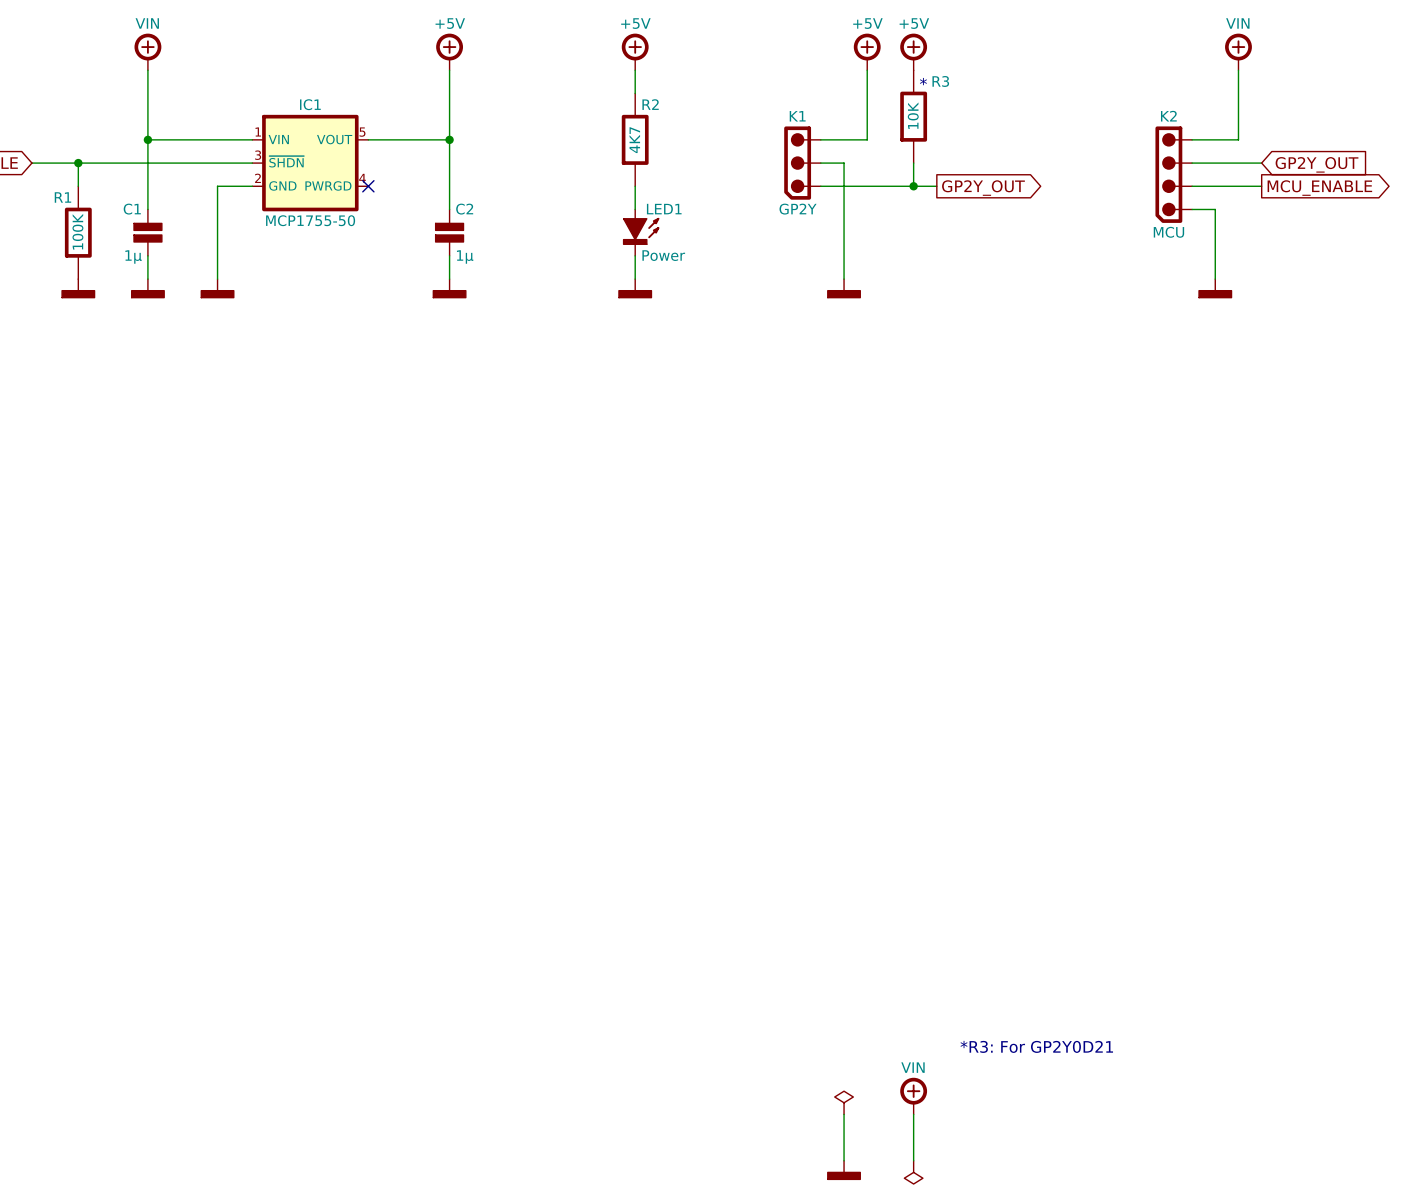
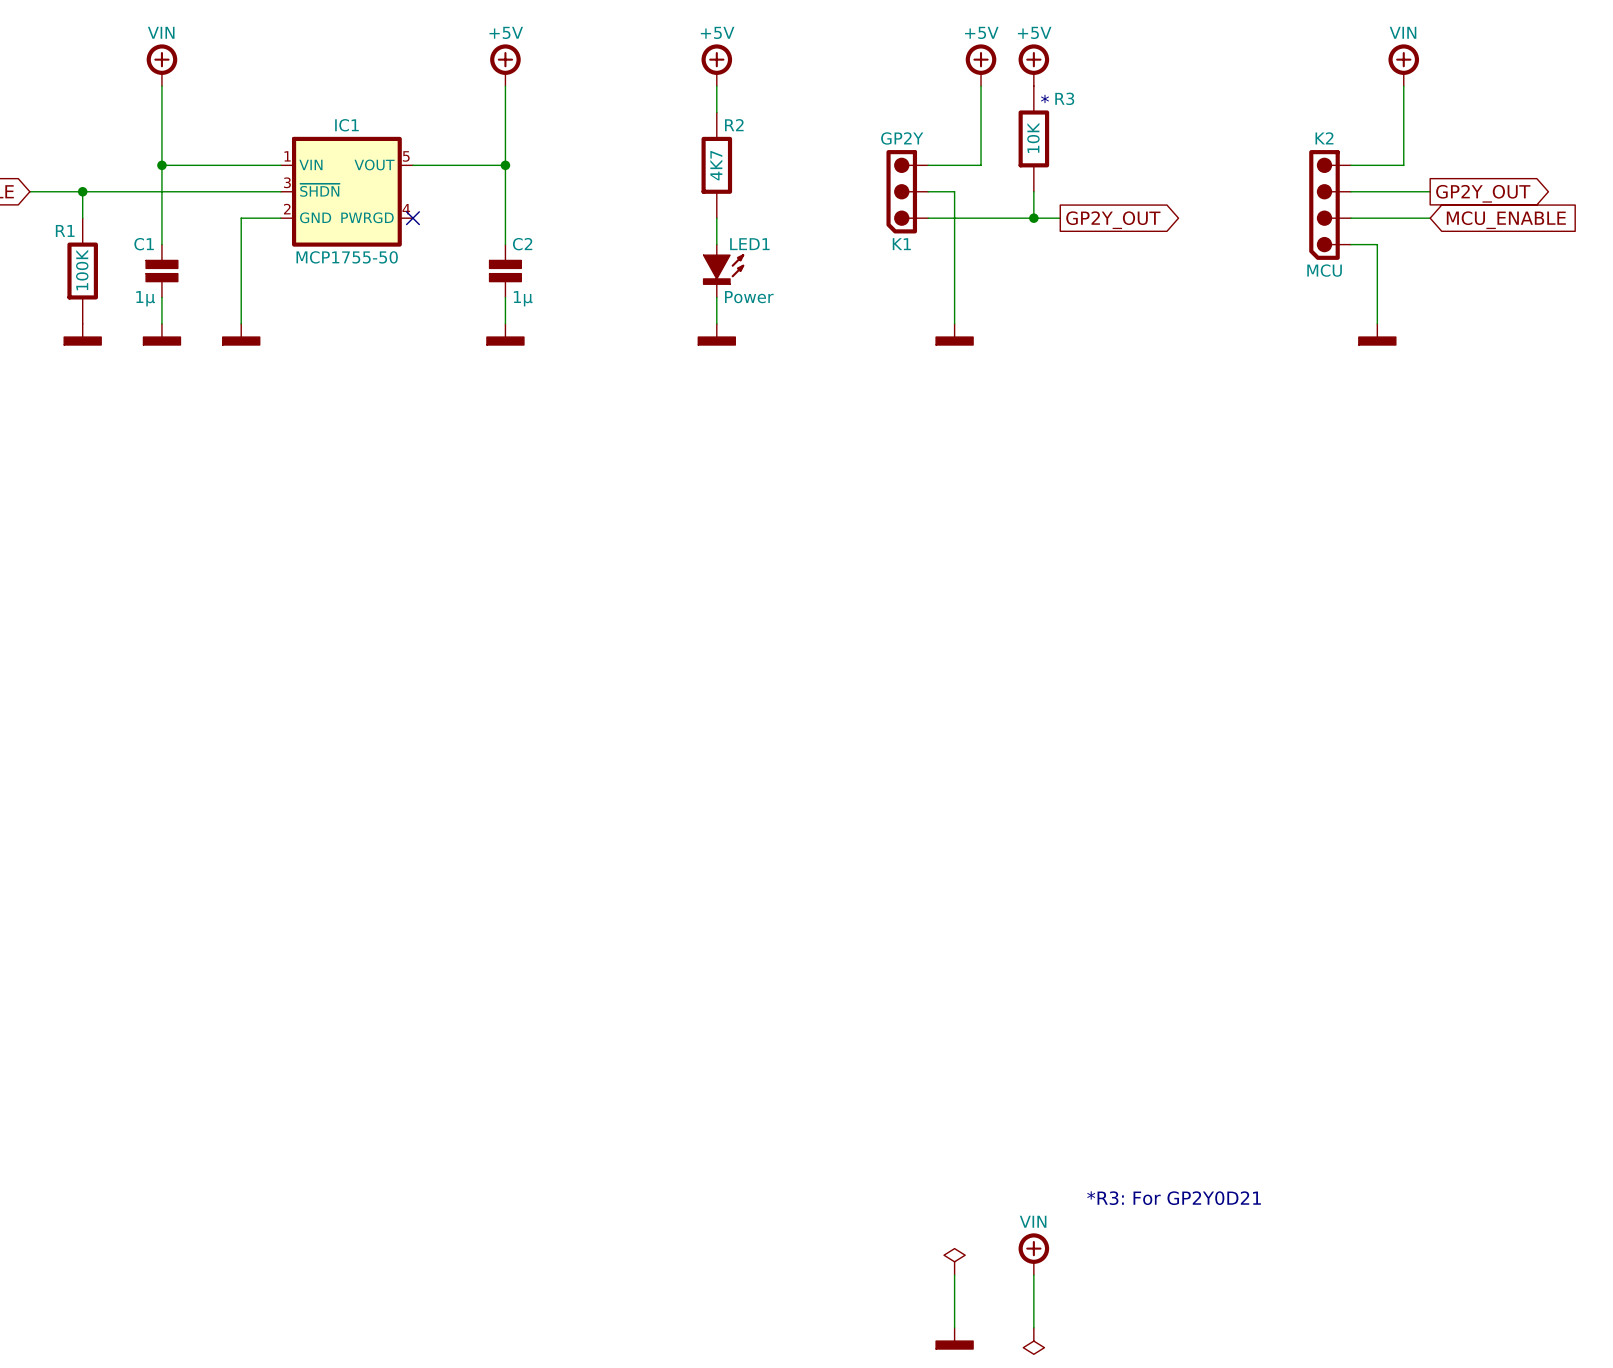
K1 name position: K1 (797, 116) -> K1 (901, 244)
global label shape: input (1317, 164) -> output (1483, 193)
global label shape: output (1319, 188) -> input (1506, 220)
K1 value position: GP2Y (798, 209) -> GP2Y (902, 138)

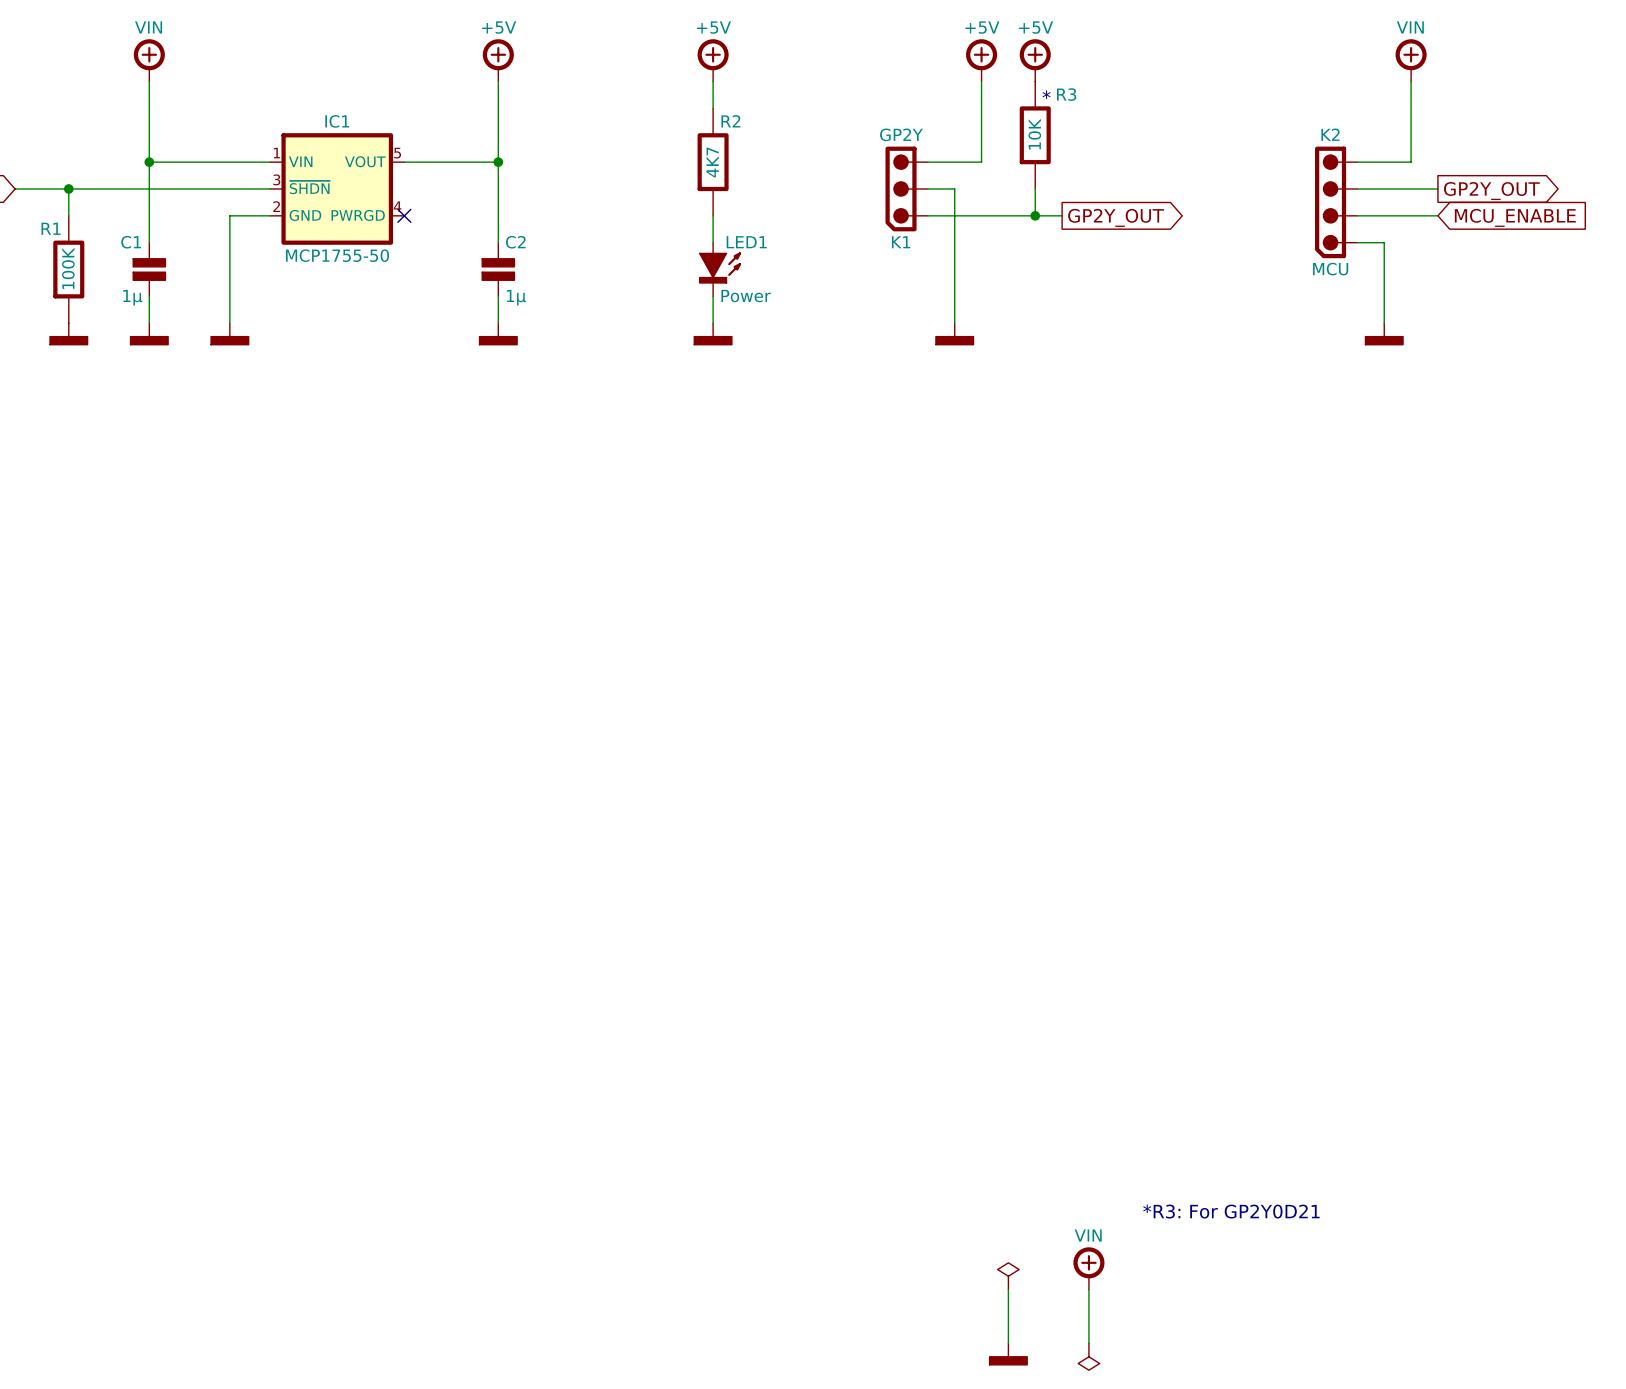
text position: *R3: For GP2Y0D21 (1174, 1198) -> *R3: For GP2Y0D21 (1231, 1211)
power symbol position: (1033, 1254) -> (1088, 1268)
power symbol: (954, 1261) -> none
power symbol: none -> (1008, 1276)
wire: (954, 1275) (954, 1327) -> (1008, 1289) (1008, 1343)
wire: (1033, 1275) (1033, 1327) -> (1088, 1289) (1088, 1343)
power symbol position: (954, 1338) -> (1008, 1354)
power symbol: (1033, 1341) -> none
power symbol: none -> (1088, 1356)

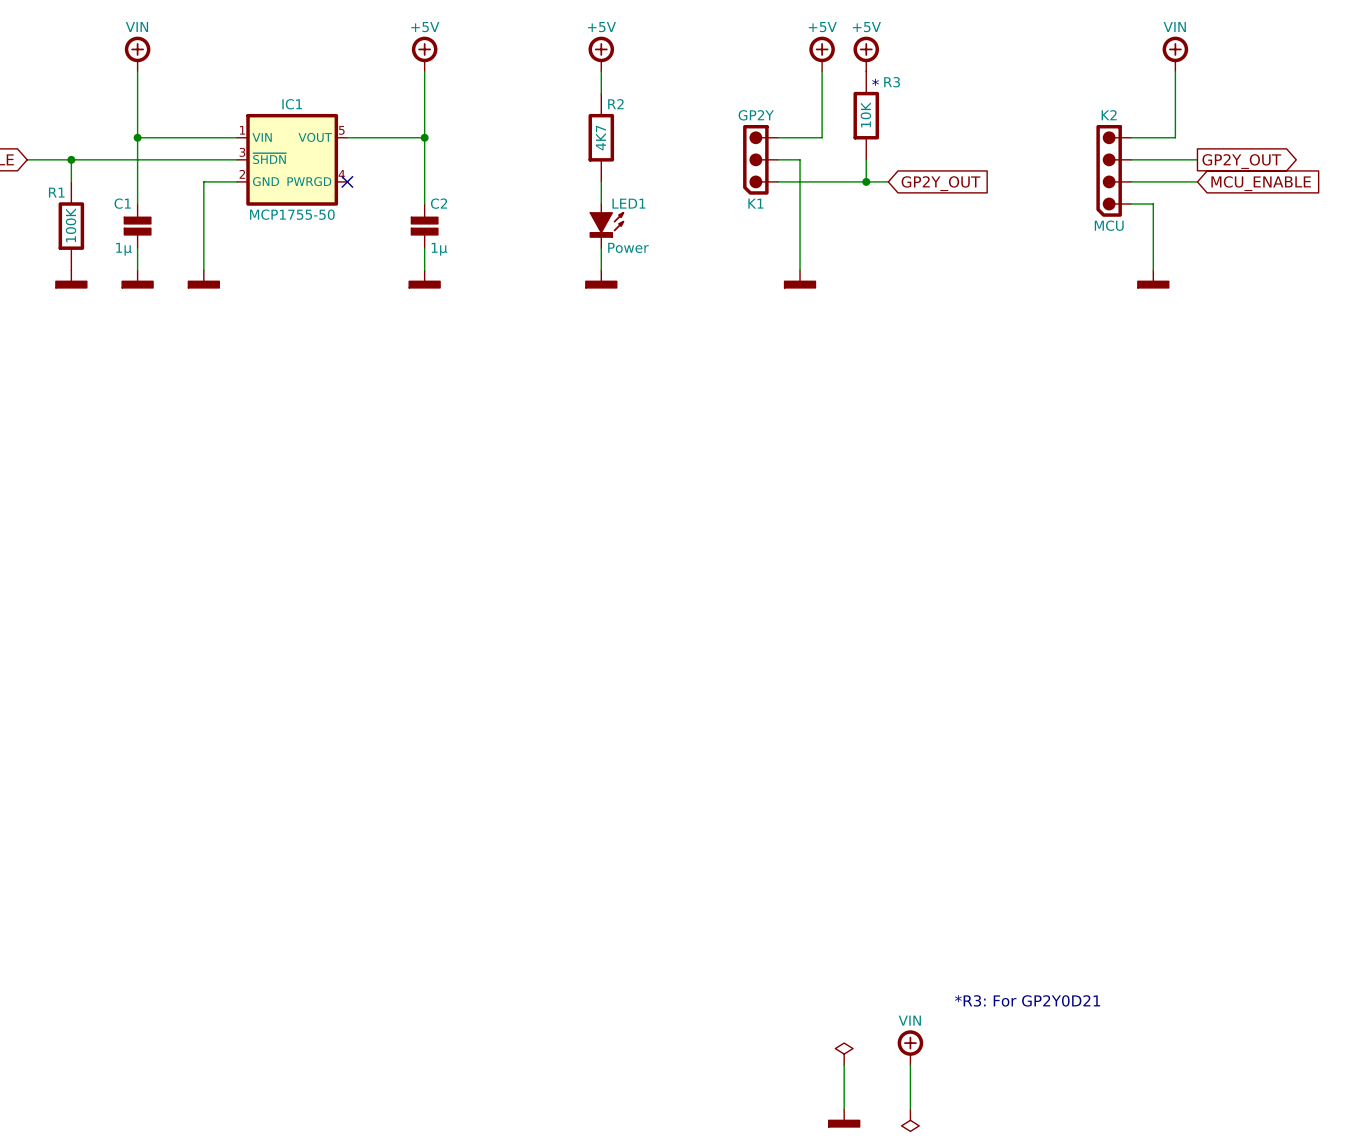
global label shape: output (1116, 217) -> input (940, 183)

